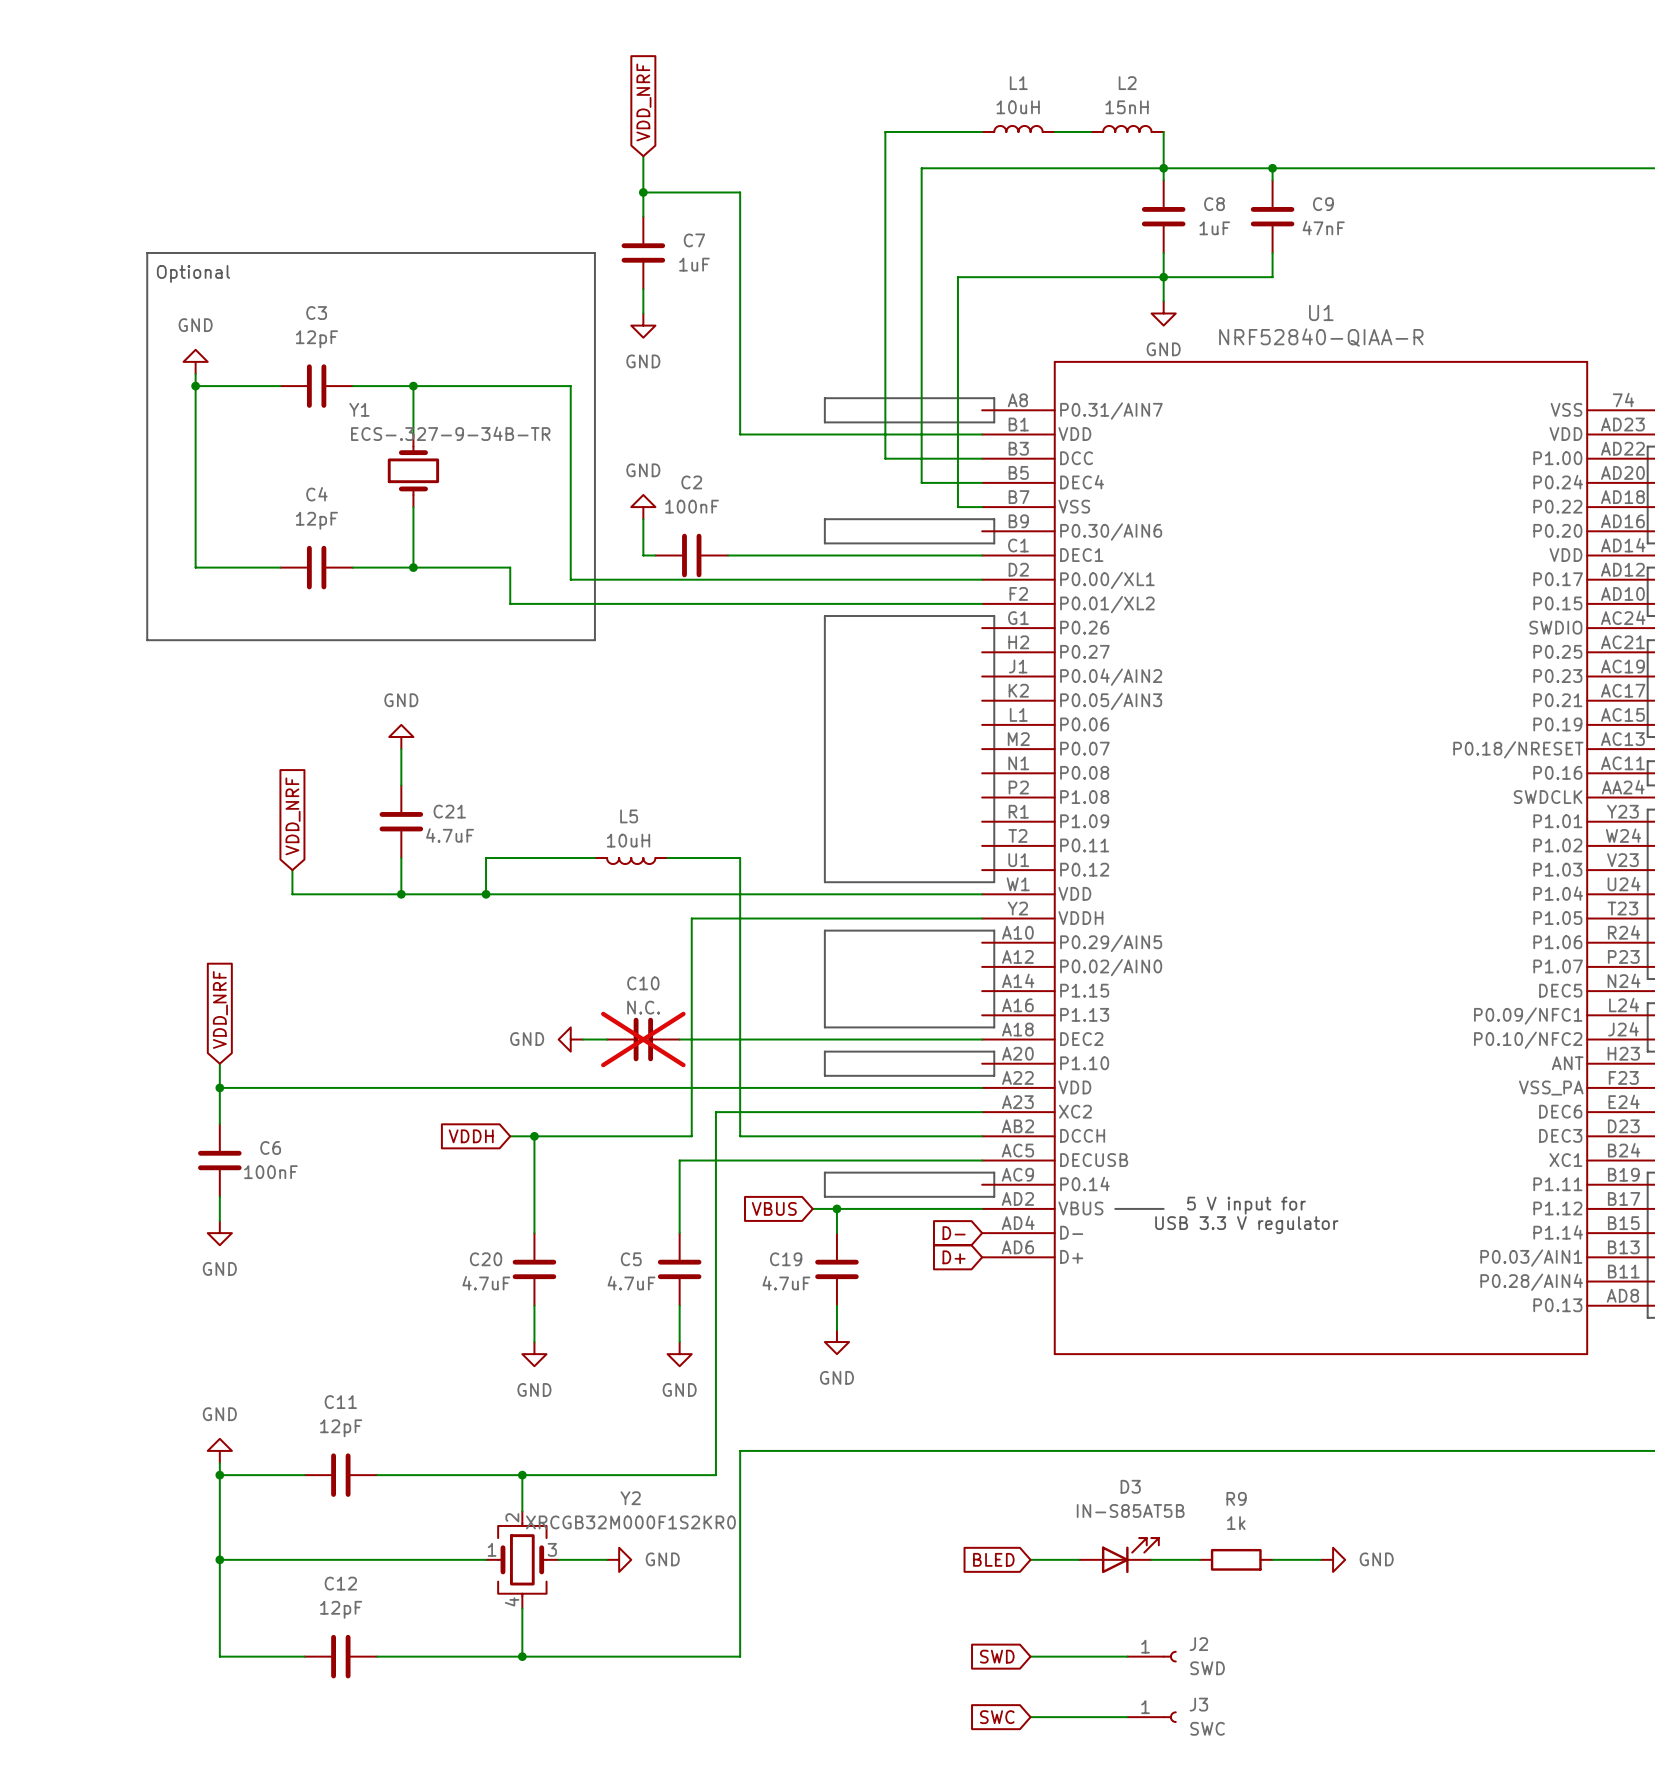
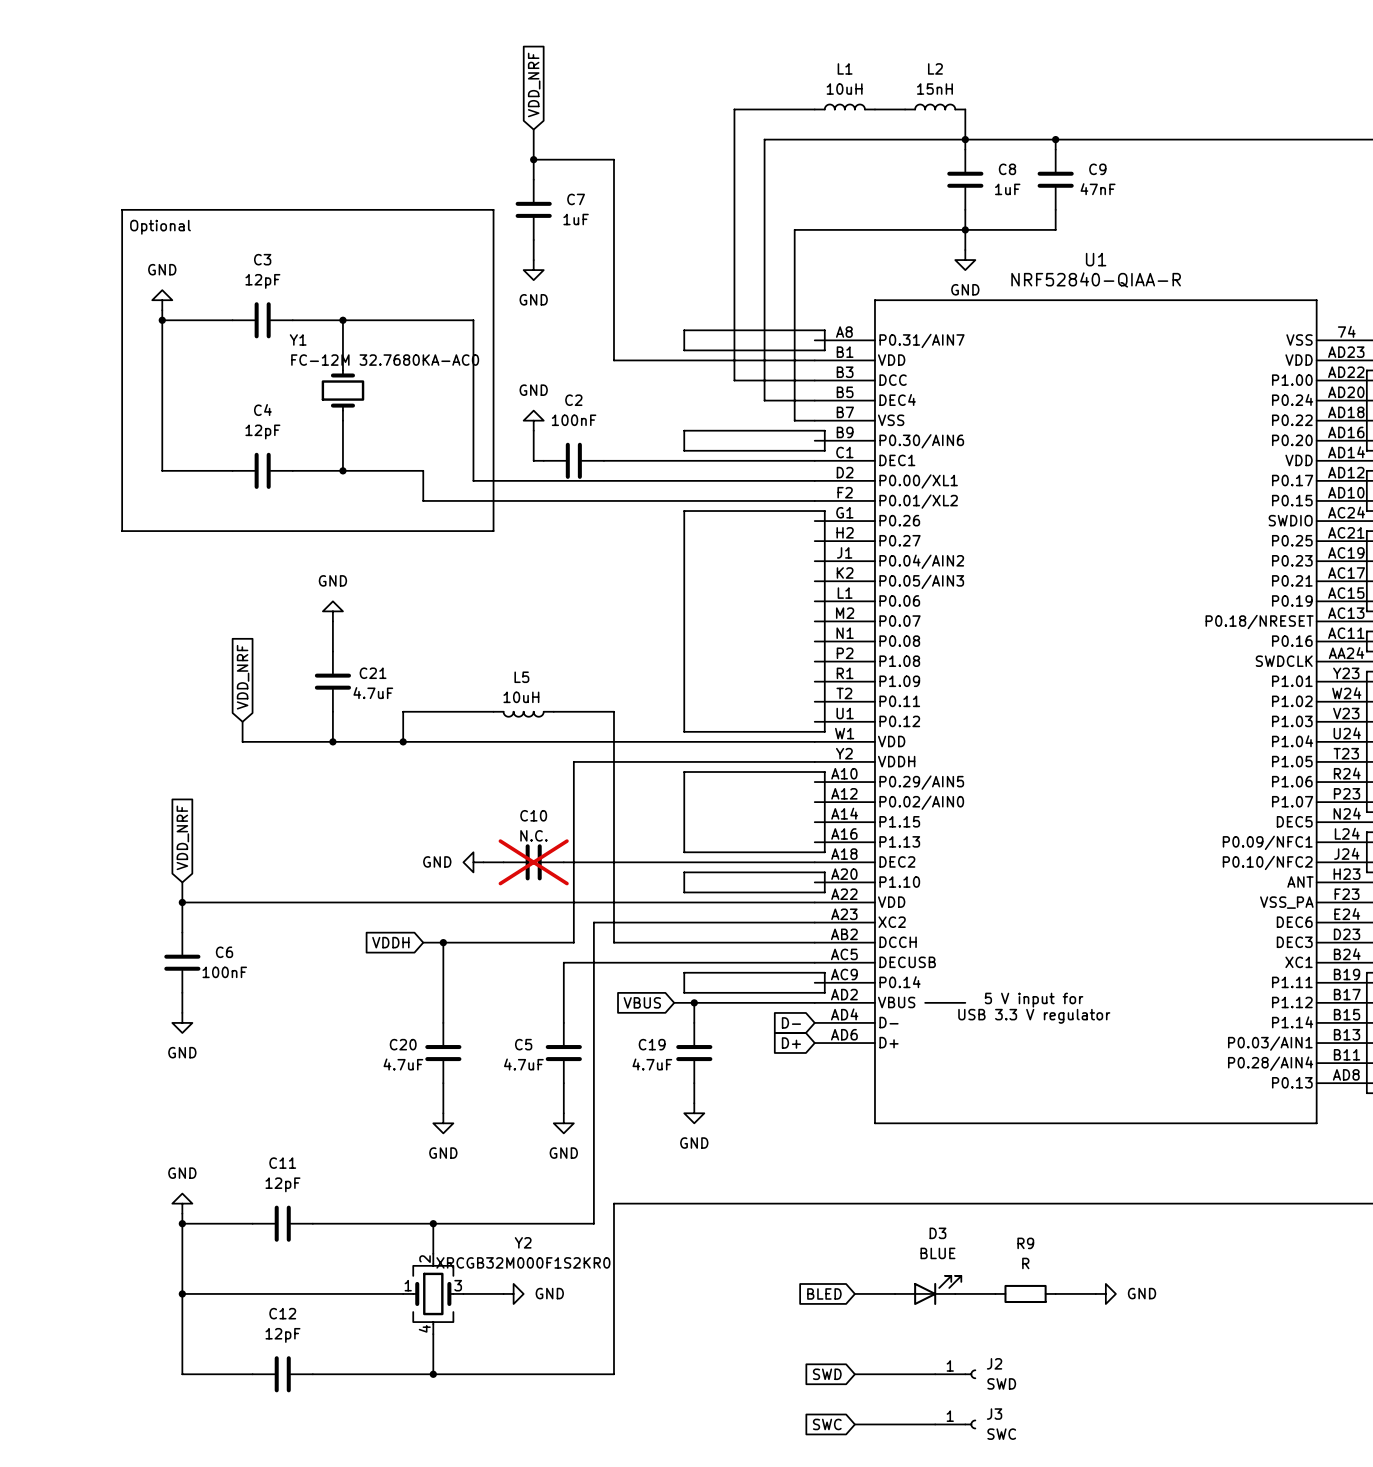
Y1 value: ECS-.327-9-34B-TR (450, 433) -> FC-12M 32.7680KA-AC0 (385, 360)
D3 value: IN-S85AT5B (1130, 1510) -> BLUE (937, 1253)
R9 value: 1k (1236, 1523) -> R (1025, 1263)

